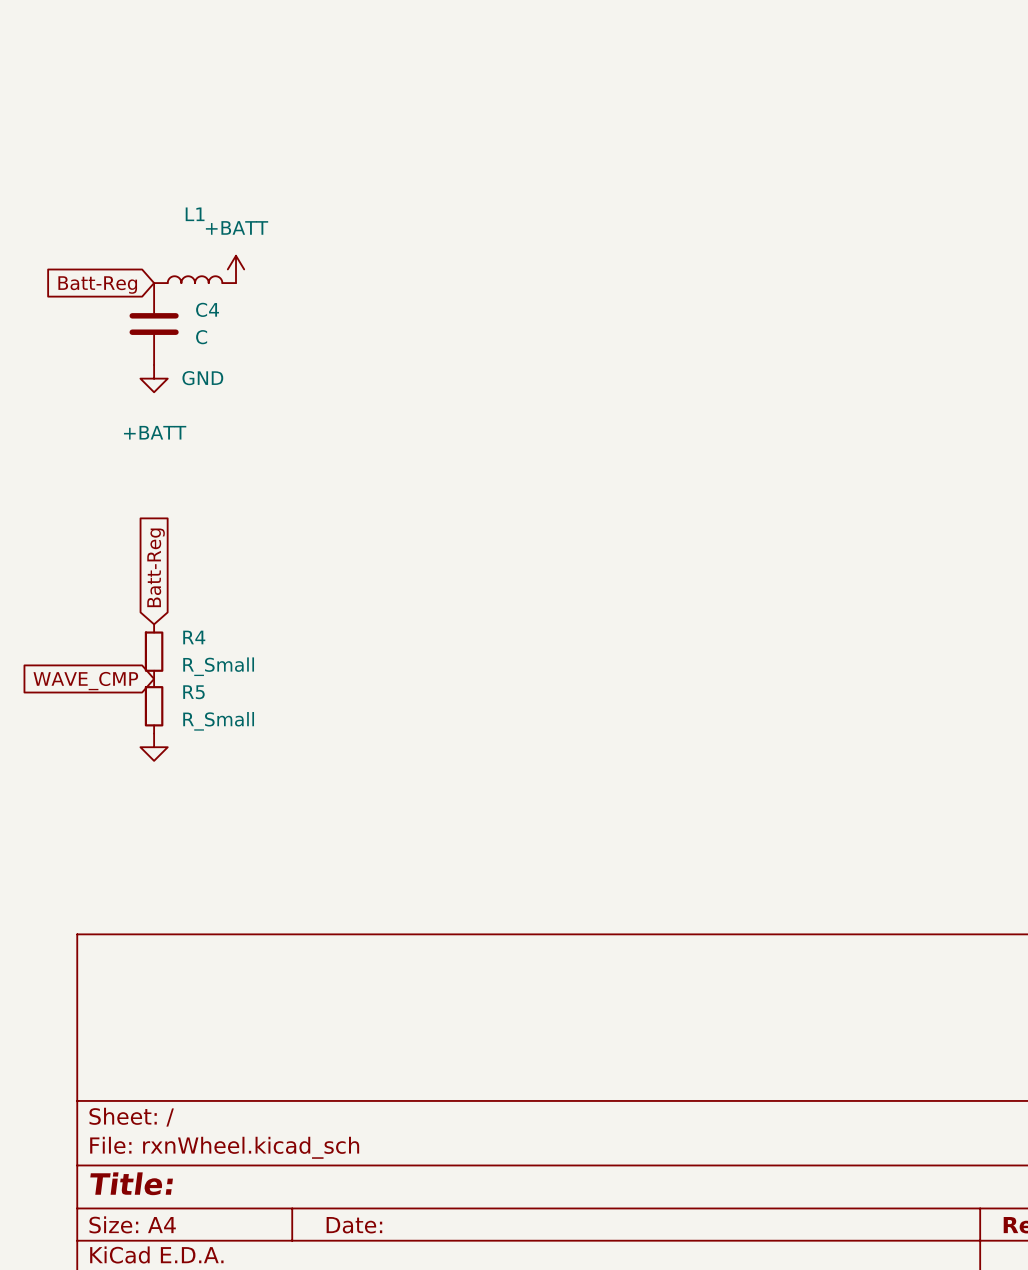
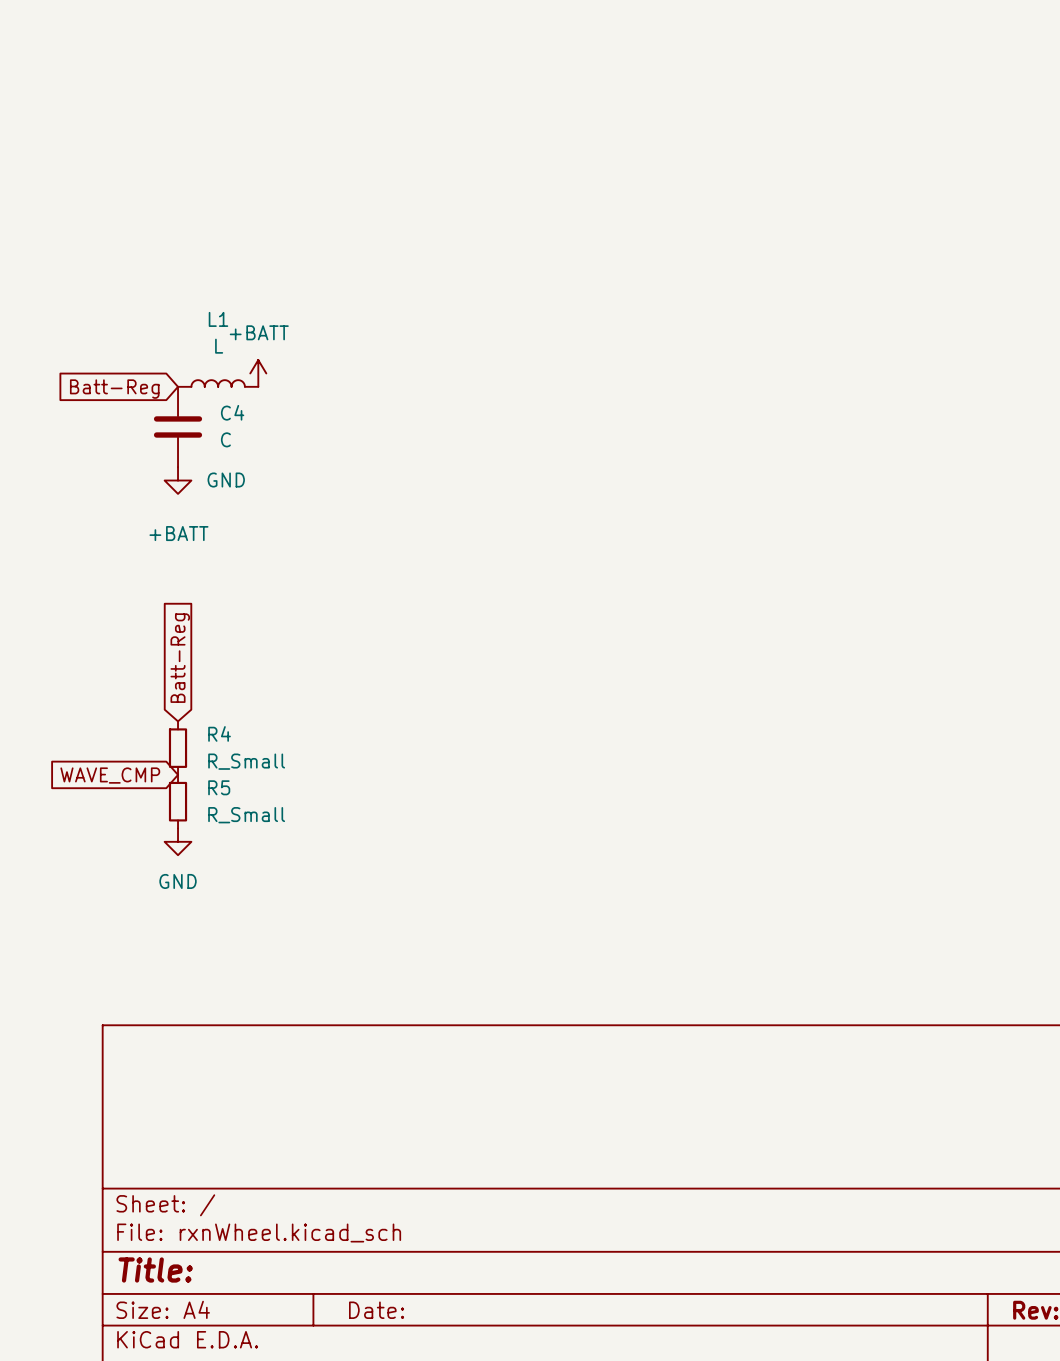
L1 value: none -> L (219, 346)
power symbol text: none -> GND (178, 881)

